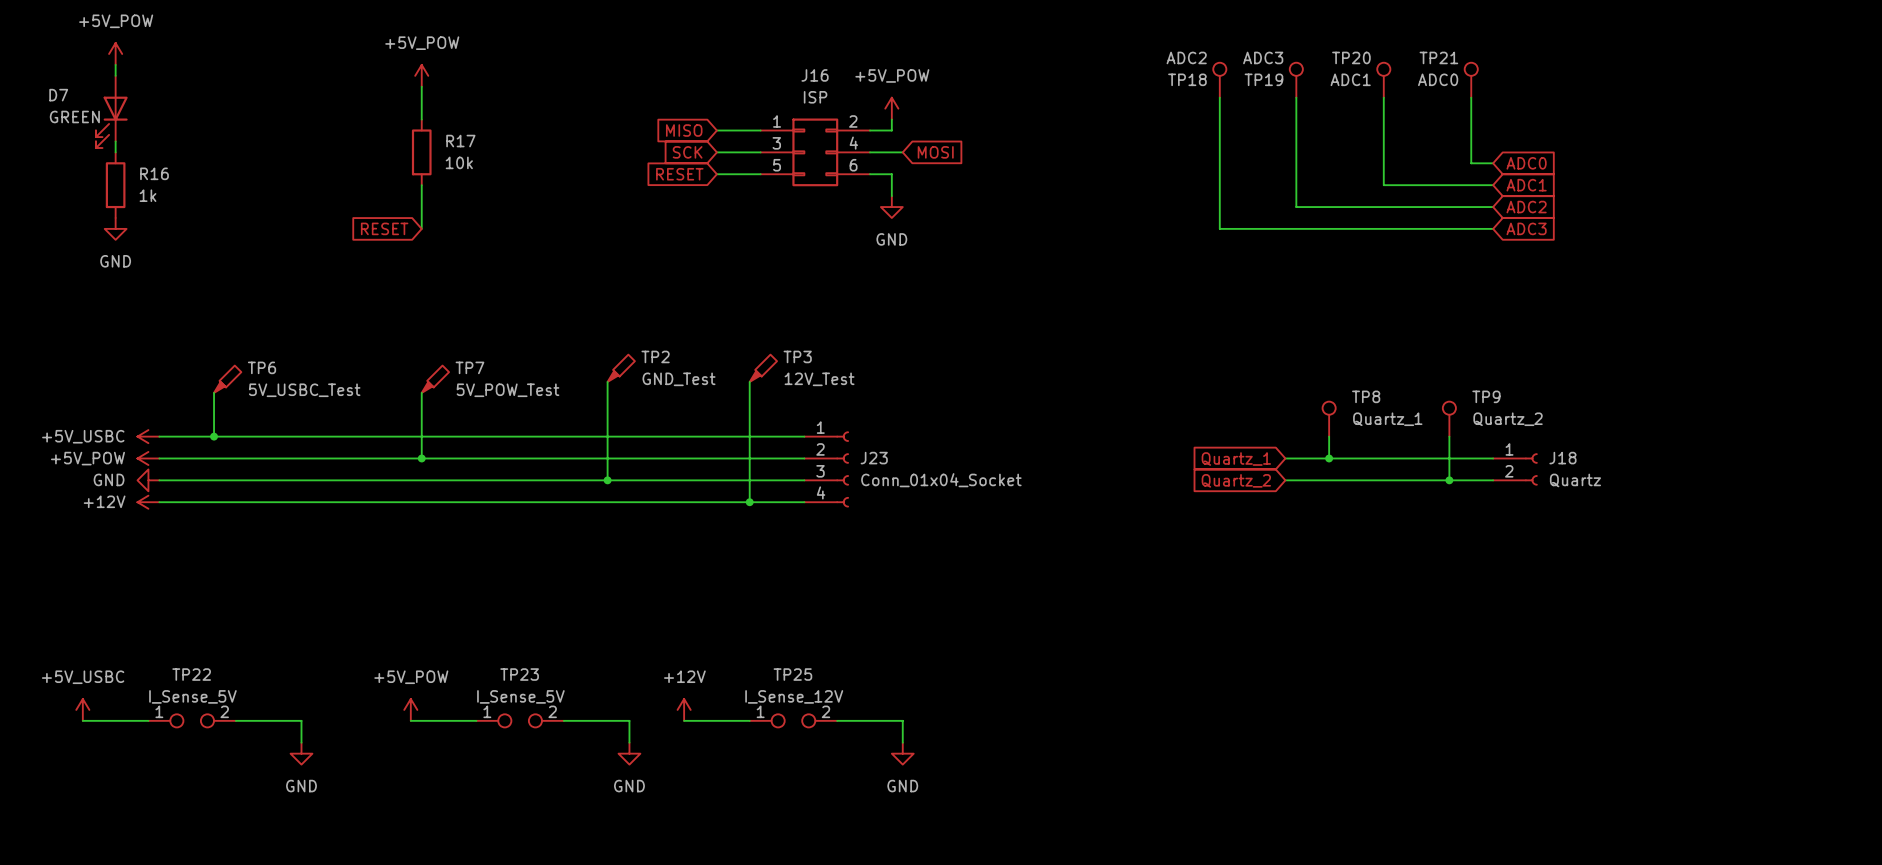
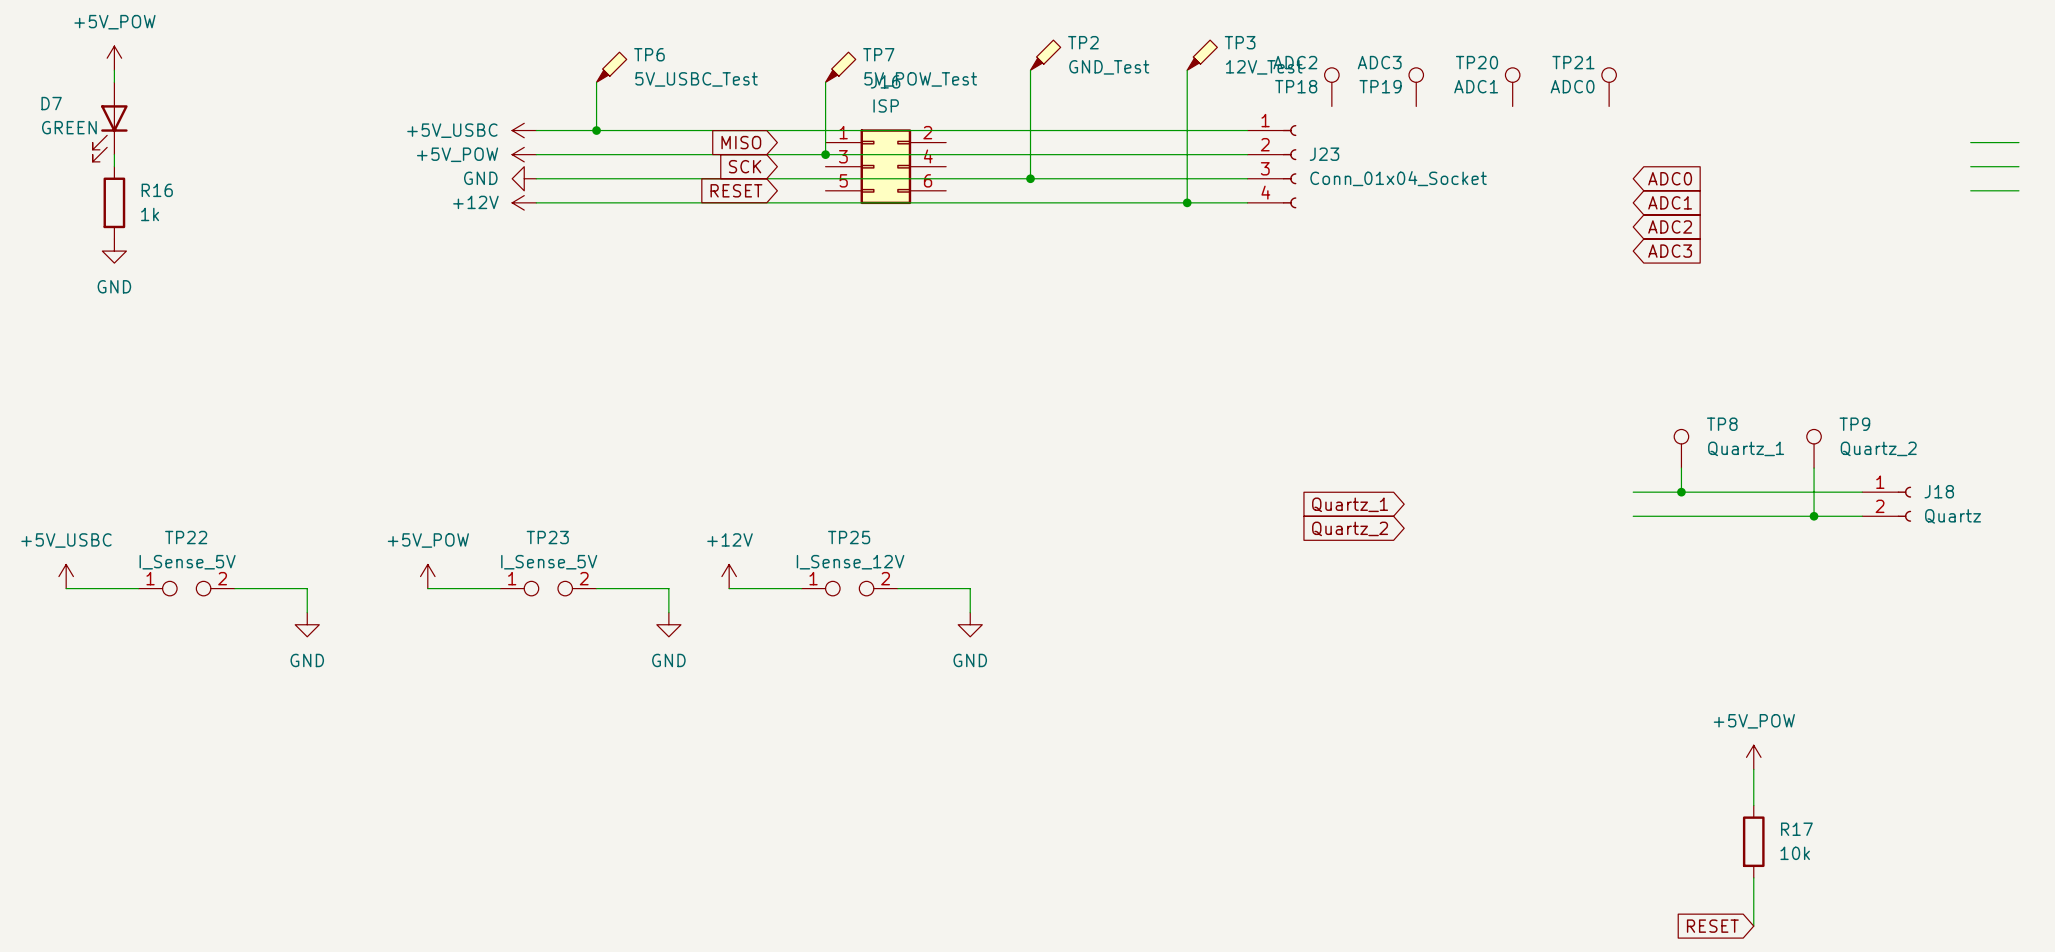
power symbol text position: +5V_POW (422, 43) -> +5V_POW (457, 154)
wire: none -> (1030, 70) (1030, 178)
wire: none -> (1187, 70) (1187, 202)
power symbol rotation: 0° (421, 75) -> 90° counterclockwise (524, 154)
power symbol position: +5V_POW (421, 75) -> +5V_POW (524, 154)
wire: none -> (825, 82) (825, 154)
wire: (421, 86) (421, 119) -> none
wire: (1219, 97) (1219, 228) (1493, 228) -> none
wire: (1296, 97) (1296, 207) (1493, 207) -> none
wire: (1383, 97) (1383, 185) (1493, 185) -> none
wire: (1471, 97) (1471, 163) (1493, 163) -> none
power symbol: +5V_POW (891, 108) -> none
power symbol: none -> +5V_USBC (524, 130)
wire: none -> (536, 130) (1247, 130)
junction: none -> (596, 130)
wire: (891, 119) (891, 130) (869, 130) -> none
wire: (716, 130) (760, 130) -> none
wire: none -> (1970, 142) (2018, 142)
wire: none -> (536, 154) (1247, 154)
junction: none -> (825, 154)
R17 position: (421, 152) -> (1753, 841)
wire: (716, 152) (760, 152) -> none
wire: (869, 152) (902, 152) -> none
global label: MOSI (935, 152) -> none
wire: none -> (1970, 166) (2018, 166)
power symbol: none -> GND (524, 178)
wire: none -> (536, 178) (1247, 178)
junction: none -> (1030, 178)
wire: (716, 174) (760, 174) -> none
wire: (869, 174) (891, 174) (891, 196) -> none
wire: none -> (1970, 190) (2018, 190)
wire: (421, 185) (421, 228) -> (596, 82) (596, 130)
power symbol: none -> +12V (524, 202)
wire: none -> (536, 202) (1247, 202)
junction: none -> (1187, 202)
power symbol: GND (891, 207) -> none
global label: RESET (384, 228) -> none
TP2 position: (621, 368) -> (1045, 55)
TP3 position: (763, 368) -> (1202, 55)
TP6 position: (227, 379) -> (611, 67)
TP7 position: (435, 379) -> (840, 67)
wire: (607, 381) (607, 480) -> none
wire: (749, 381) (749, 502) -> none
wire: (214, 392) (214, 436) -> none
wire: (421, 392) (421, 458) -> none
TP8 position: (1329, 419) -> (1681, 448)
TP9 position: (1449, 419) -> (1814, 448)
power symbol: +5V_USBC (148, 436) -> none
wire: (159, 436) (804, 436) -> none
junction: (214, 436) -> none
wire: (1329, 436) (1329, 458) -> (1681, 468) (1681, 492)
wire: (1449, 436) (1449, 480) -> (1814, 468) (1814, 516)
junction: none -> (1681, 492)
power symbol: +5V_POW (148, 458) -> none
wire: (159, 458) (804, 458) -> none
junction: (421, 458) -> none
wire: (1285, 458) (1493, 458) -> (1633, 492) (1862, 492)
junction: (1329, 458) -> none
J23 position: (826, 469) -> (1271, 166)
J18 position: (1515, 469) -> (1886, 504)
junction: none -> (1814, 516)
power symbol: GND (148, 480) -> none
wire: (159, 480) (804, 480) -> none
junction: (607, 480) -> none
wire: (1285, 480) (1493, 480) -> (1633, 516) (1862, 516)
junction: (1449, 480) -> none
power symbol: +12V (148, 502) -> none
wire: (159, 502) (804, 502) -> none
junction: (749, 502) -> none
power symbol: none -> +5V_USBC (66, 576)
power symbol: none -> +5V_POW (427, 576)
power symbol: none -> GND (307, 624)
power symbol: none -> GND (668, 624)
power symbol: none -> GND (970, 624)
power symbol: none -> +5V_POW (1753, 757)
wire: none -> (1753, 769) (1753, 805)
power symbol: +5V_USBC (82, 709) -> none
power symbol: +5V_POW (410, 709) -> none
power symbol position: +12V (684, 709) -> +12V (729, 576)
wire: (82, 720) (148, 720) -> (66, 588) (138, 588)
TP22 position: (192, 720) -> (186, 588)
wire: (235, 720) (301, 720) (301, 742) -> (234, 588) (307, 588) (307, 612)
wire: (410, 720) (476, 720) -> (427, 588) (500, 588)
TP23 position: (520, 720) -> (548, 588)
wire: (563, 720) (629, 720) (629, 742) -> (596, 588) (668, 588) (668, 612)
wire: (684, 720) (749, 720) -> (729, 588) (801, 588)
TP25 position: (793, 720) -> (849, 588)
wire: (837, 720) (902, 720) (902, 742) -> (897, 588) (970, 588) (970, 612)
power symbol: GND (301, 753) -> none
power symbol: GND (629, 753) -> none
power symbol: GND (902, 753) -> none
wire: none -> (1753, 877) (1753, 926)
global label: none -> RESET (1712, 926)

